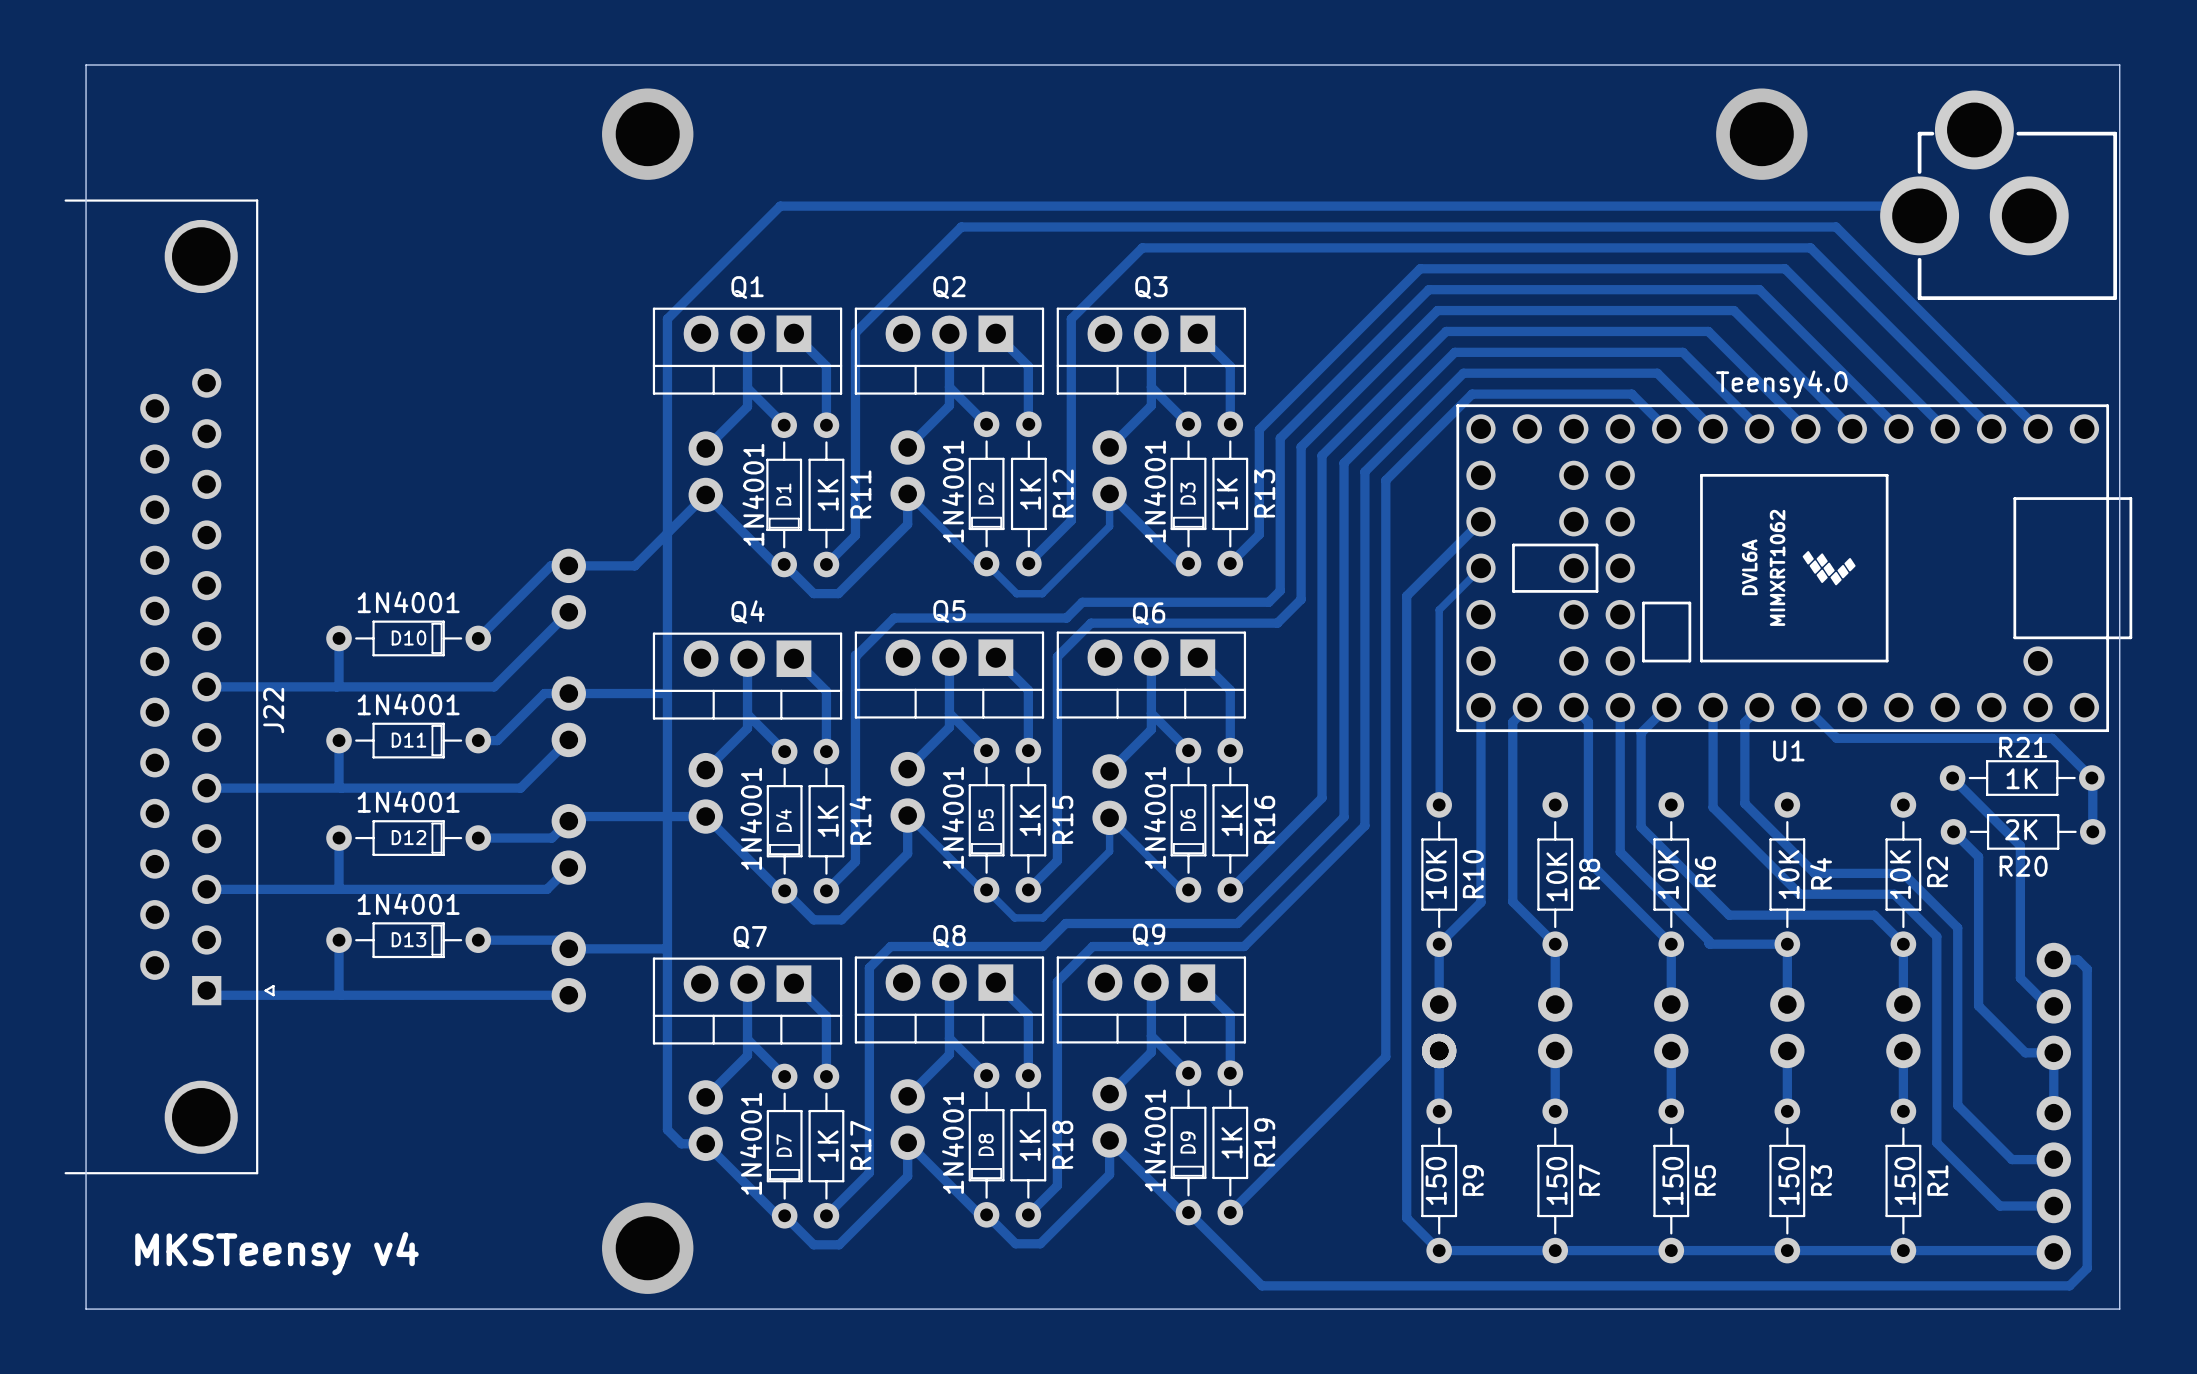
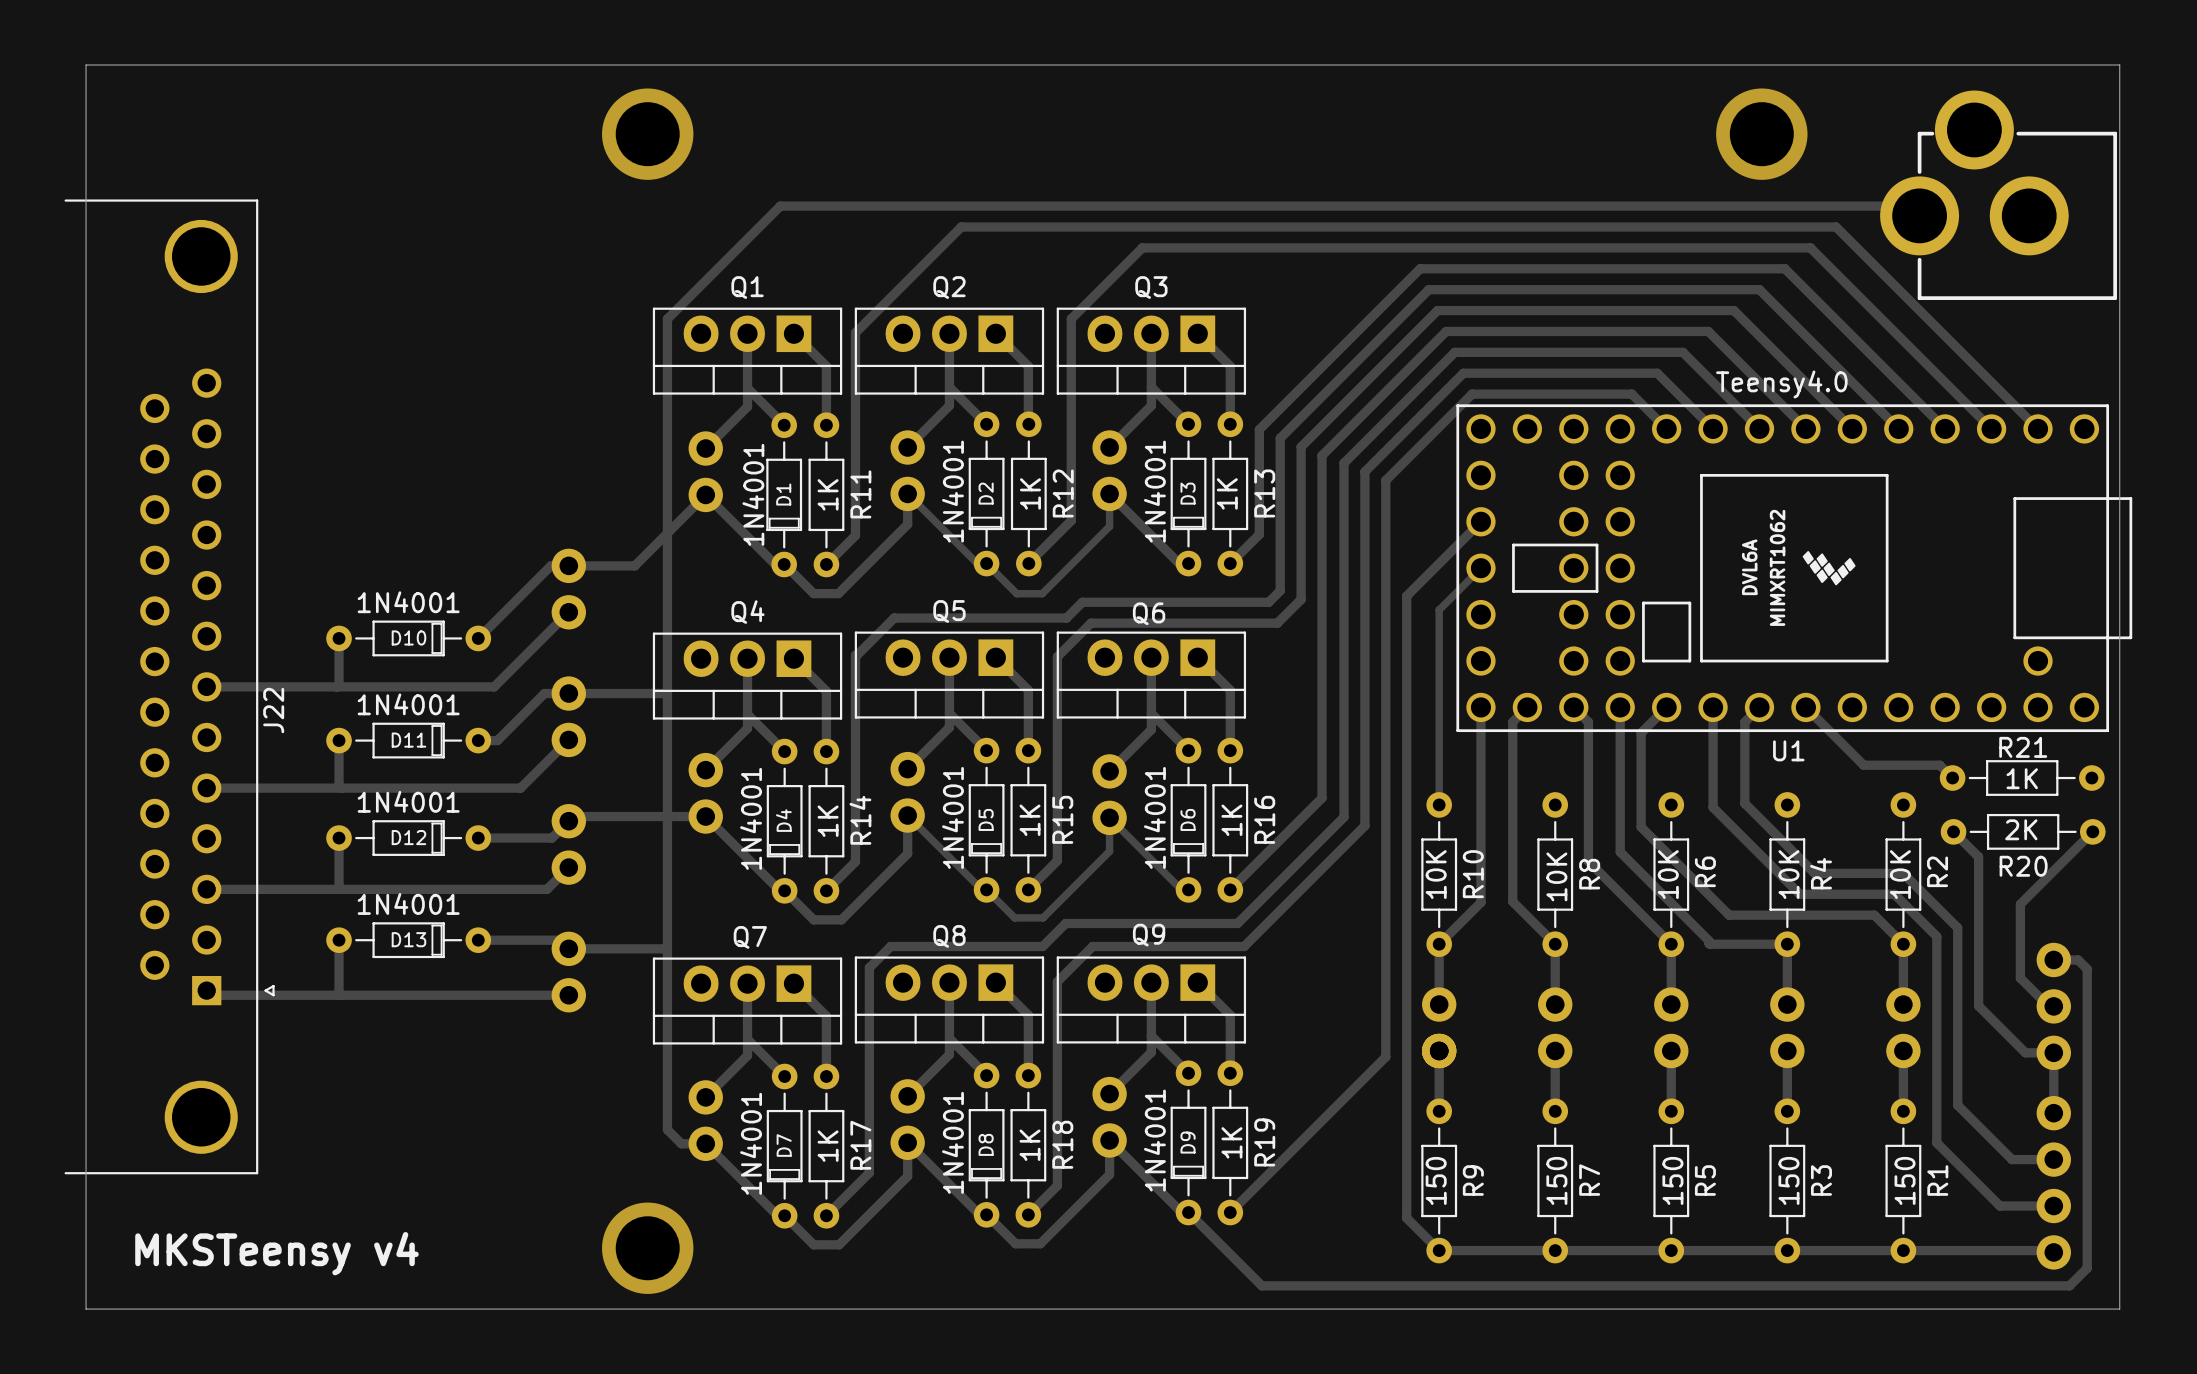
track: (1836, 738) (2052, 738) (2092, 778) (2092, 831) -> (1836, 738) (1863, 765) (1939, 765) (1952, 778)
track: (1952, 778) (2020, 845) (2020, 904) -> (2092, 831) (2020, 904)

